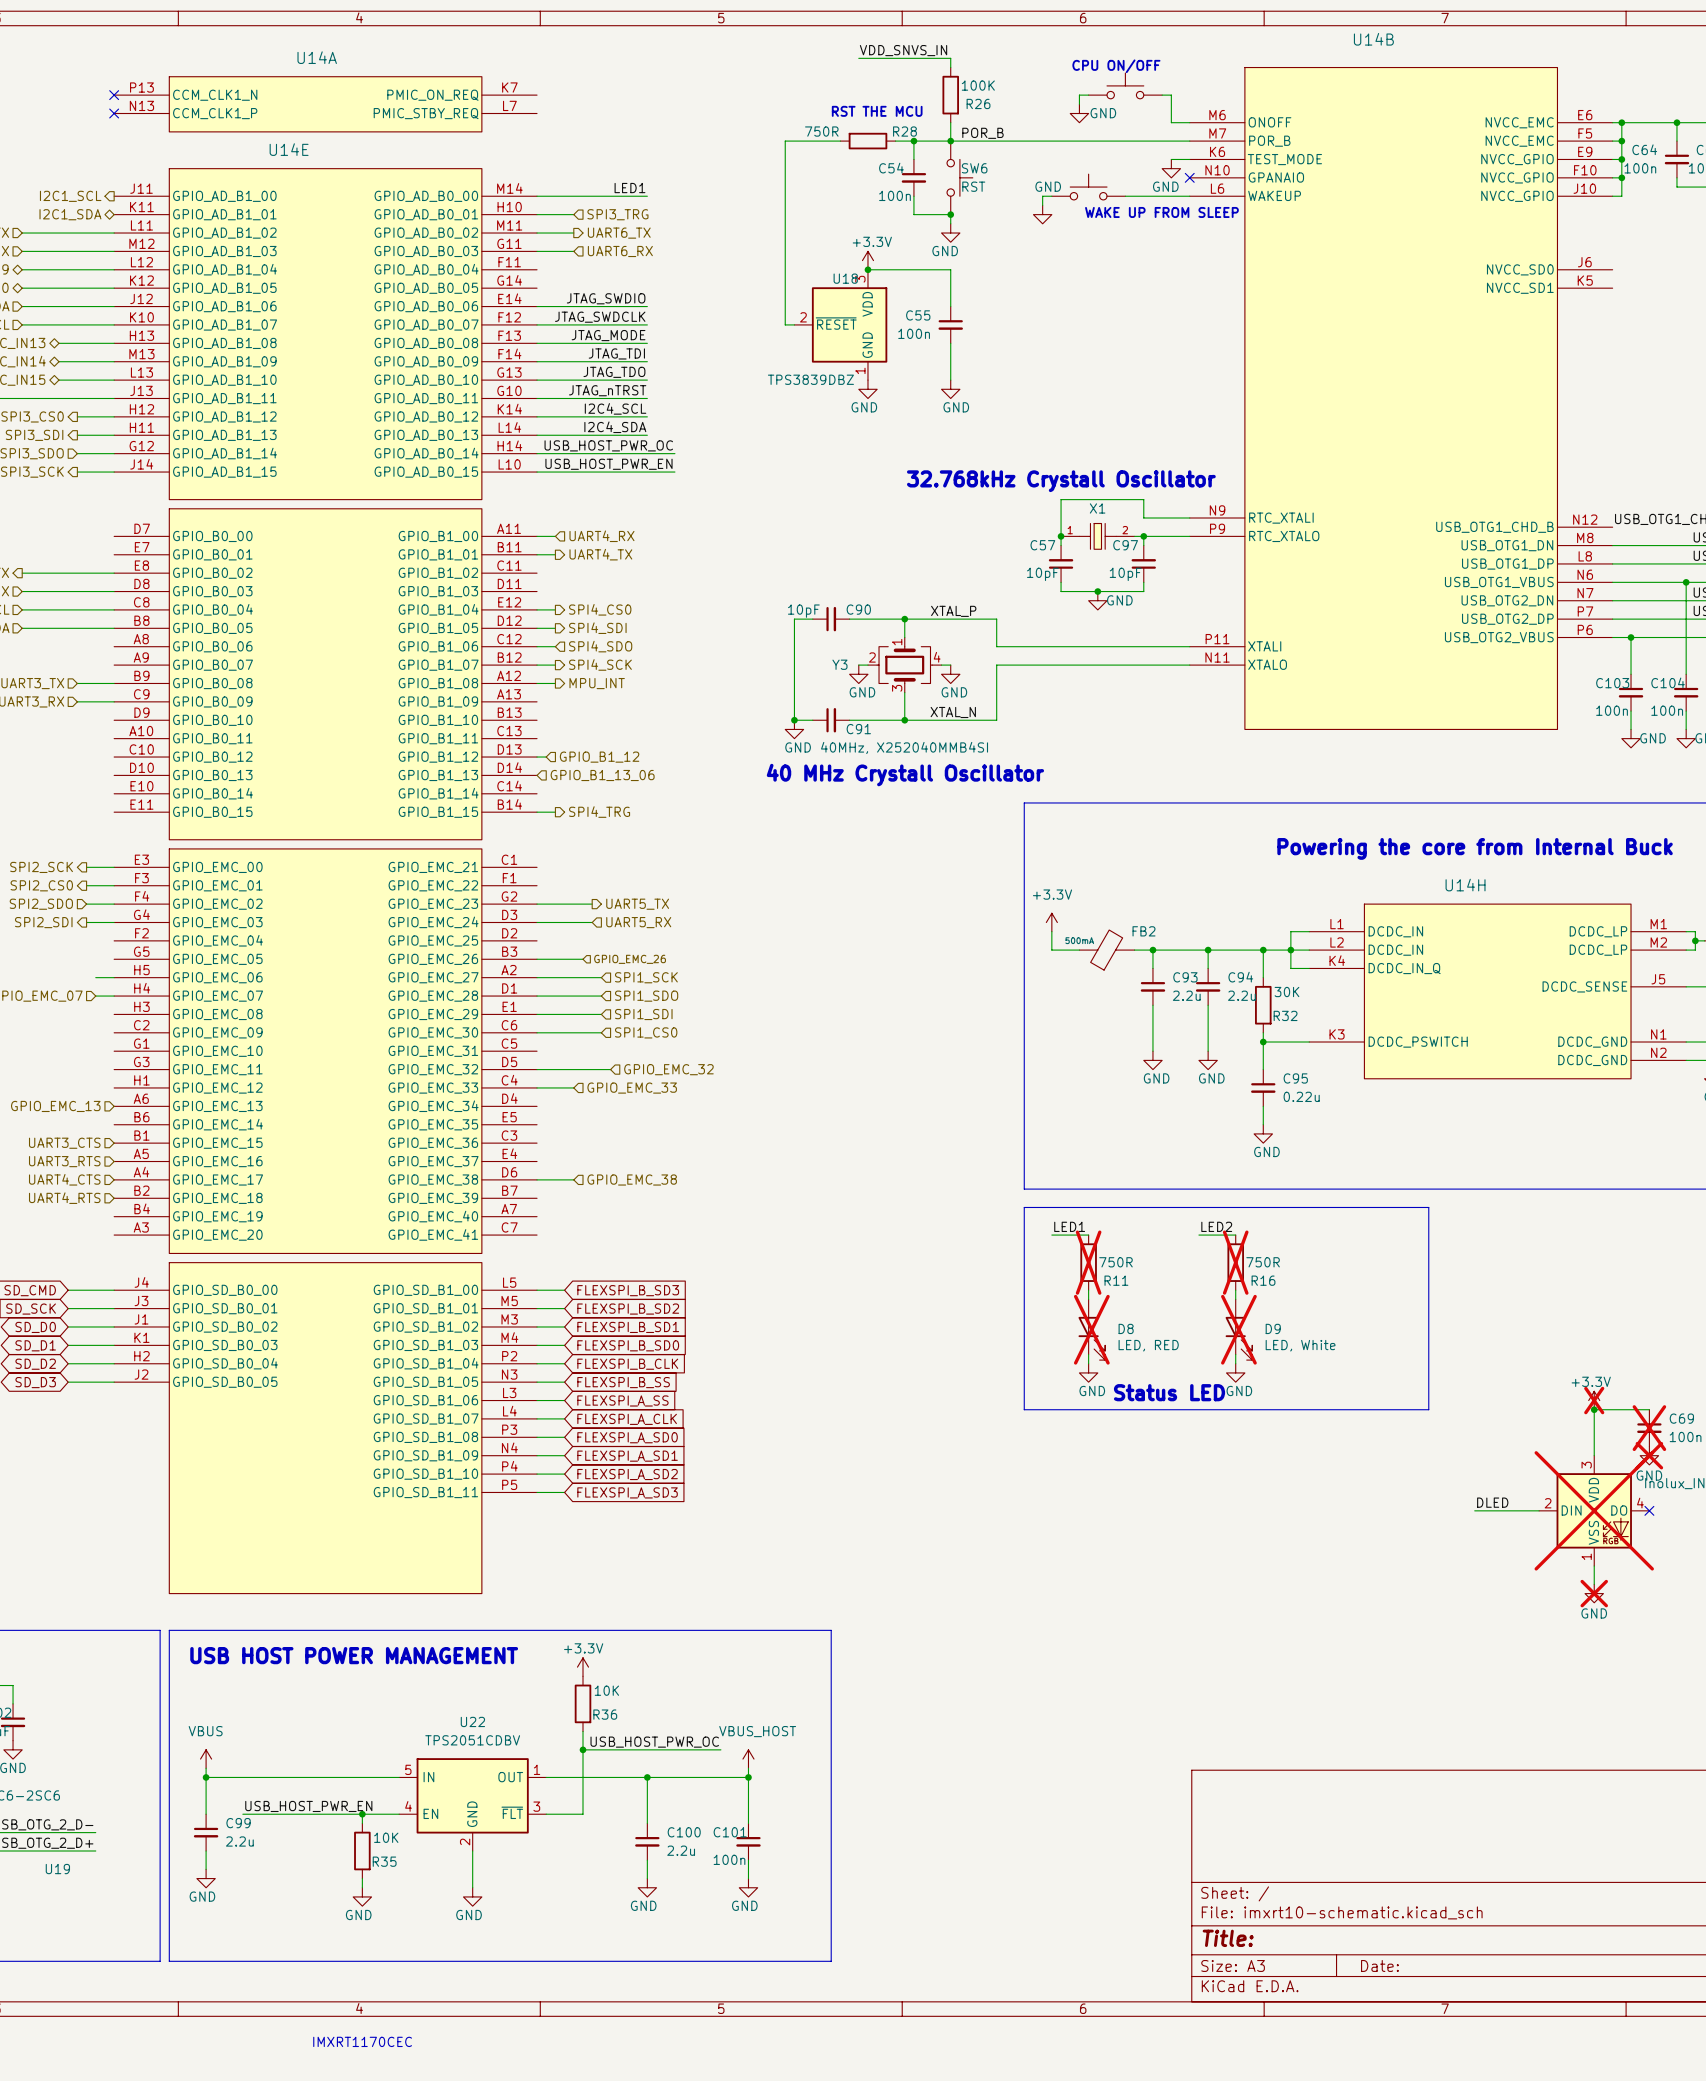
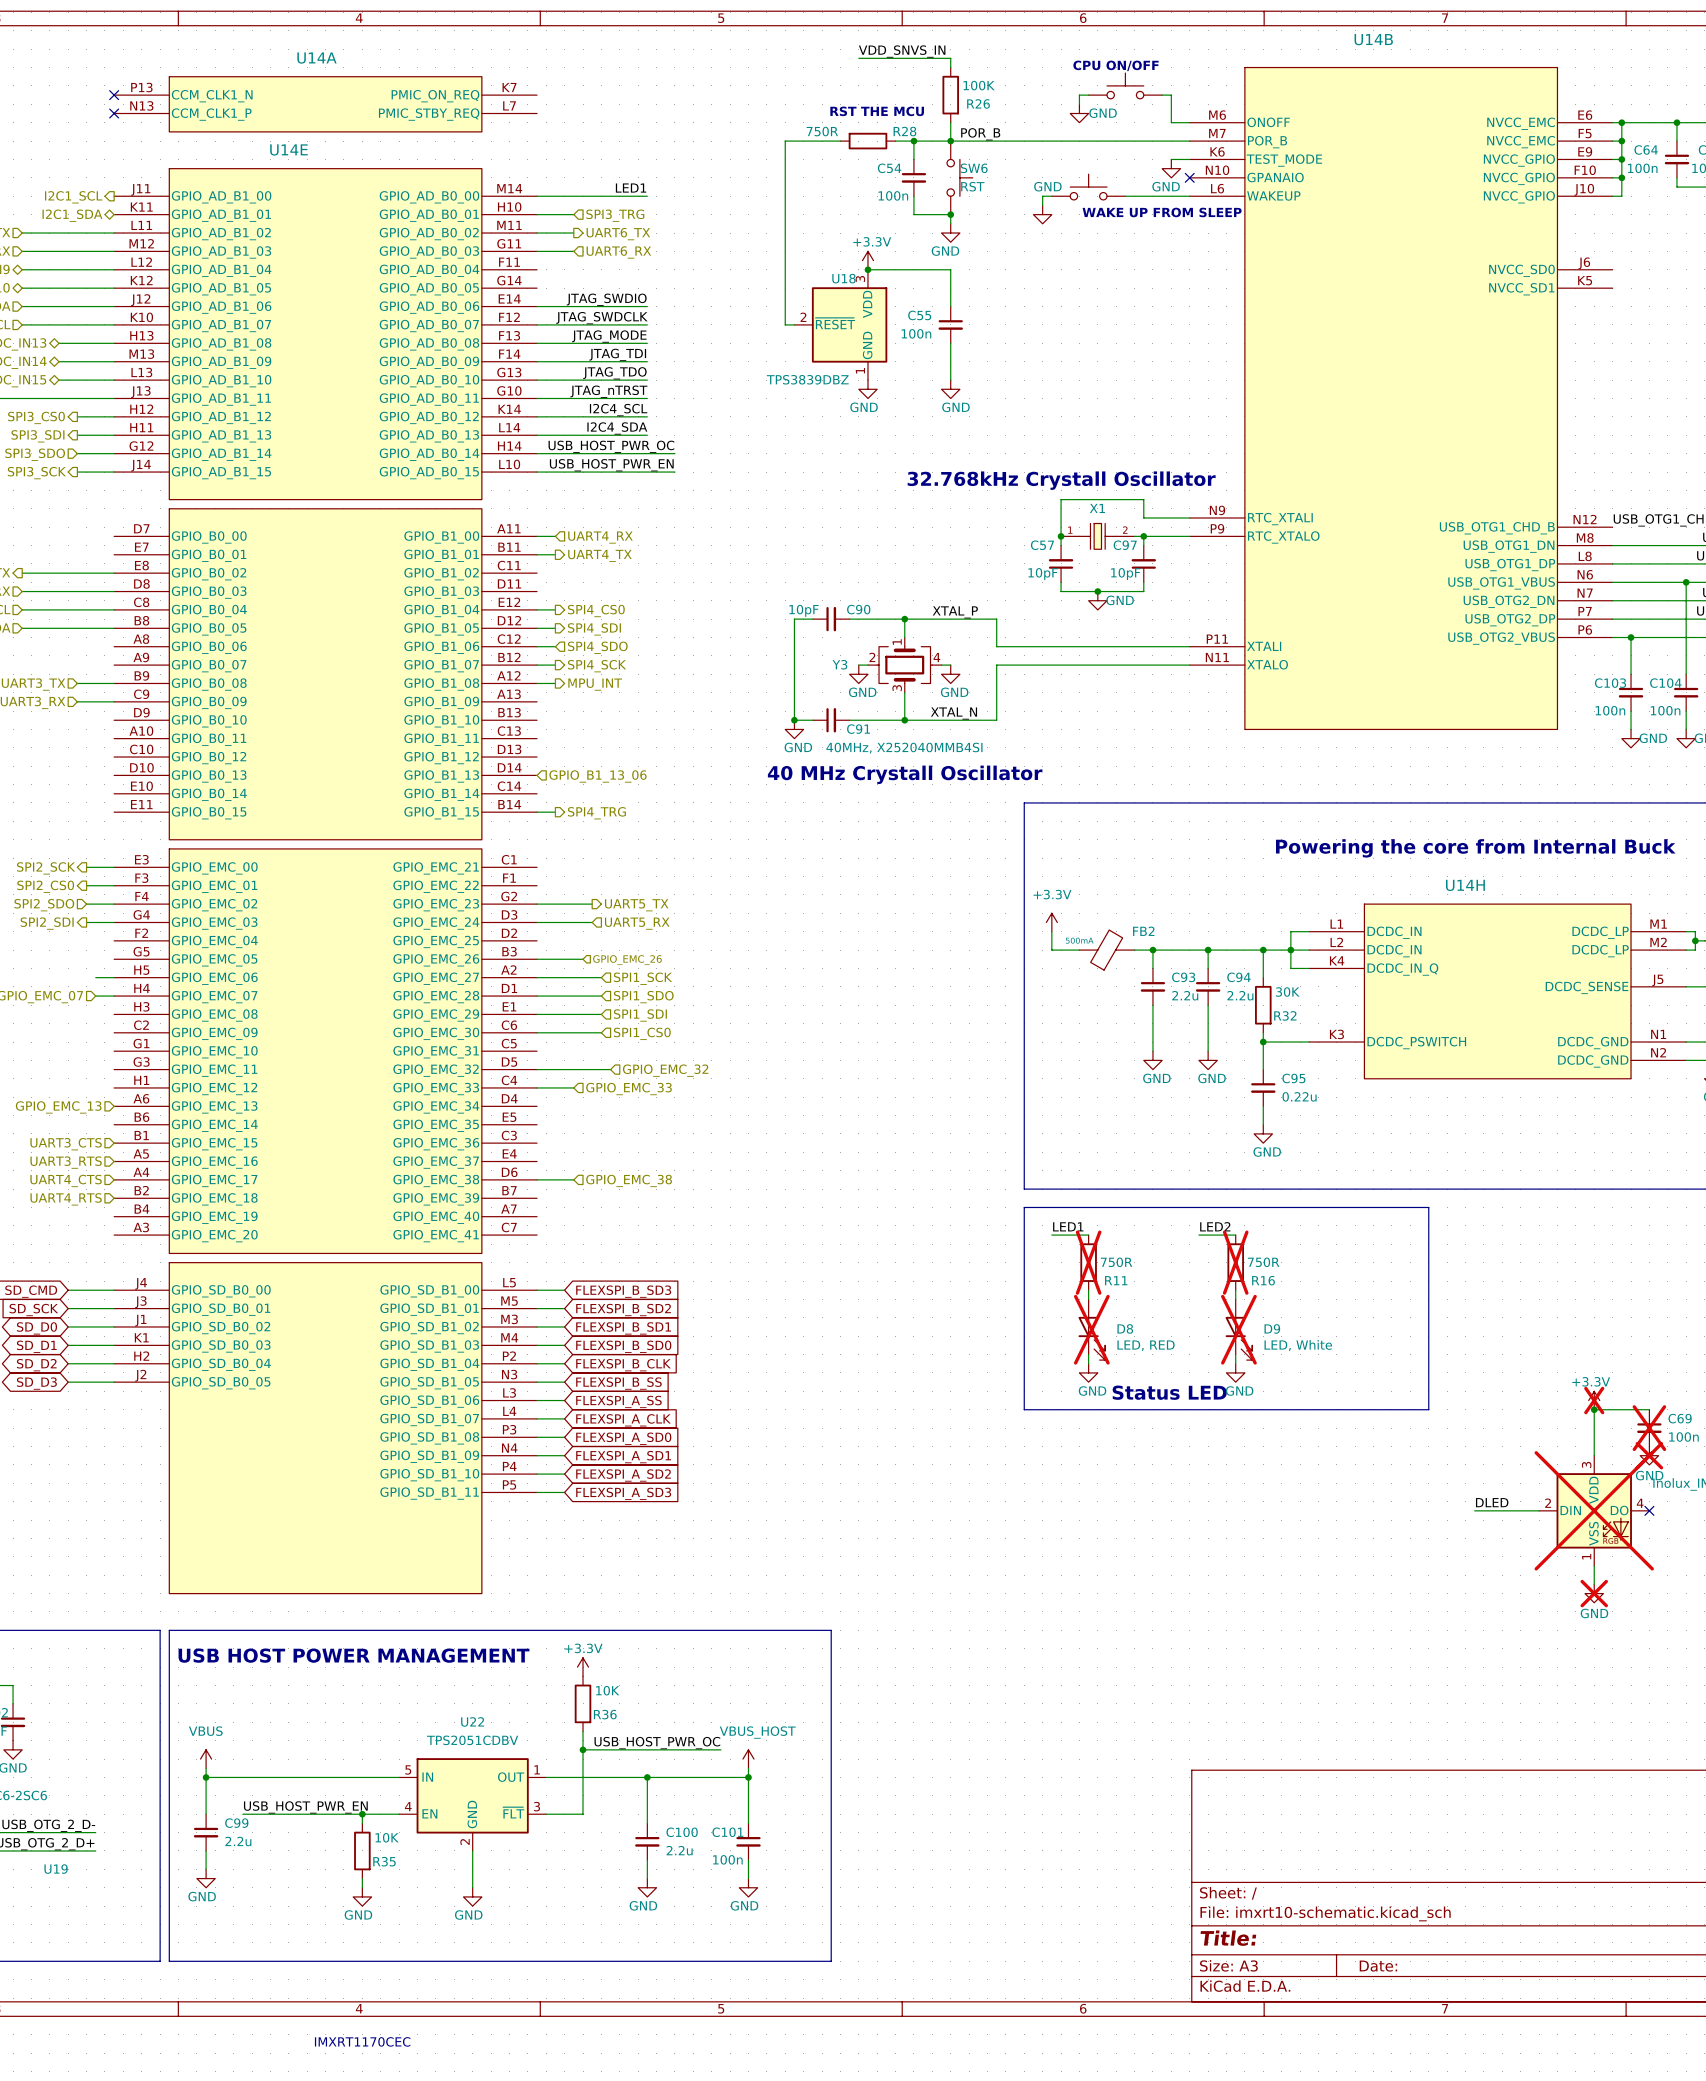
wire: (537, 757) (546, 757) -> none
hierarchical label: GPIO_B1_12 (599, 757) -> none

